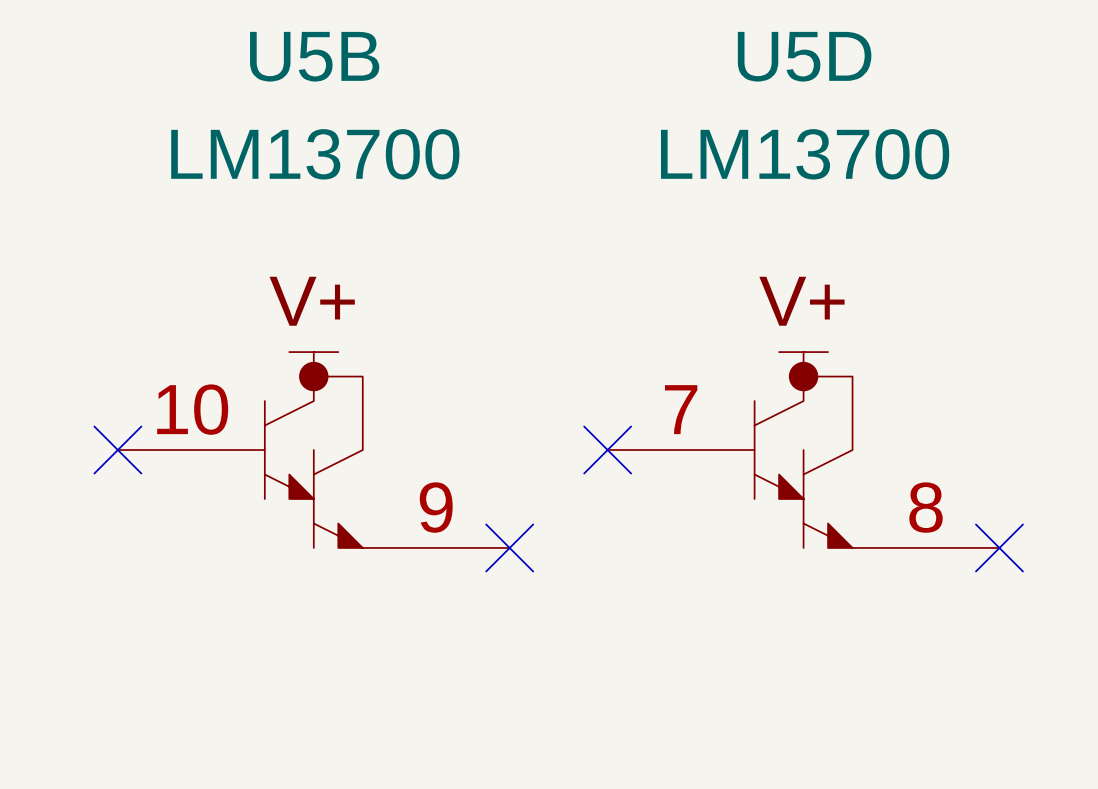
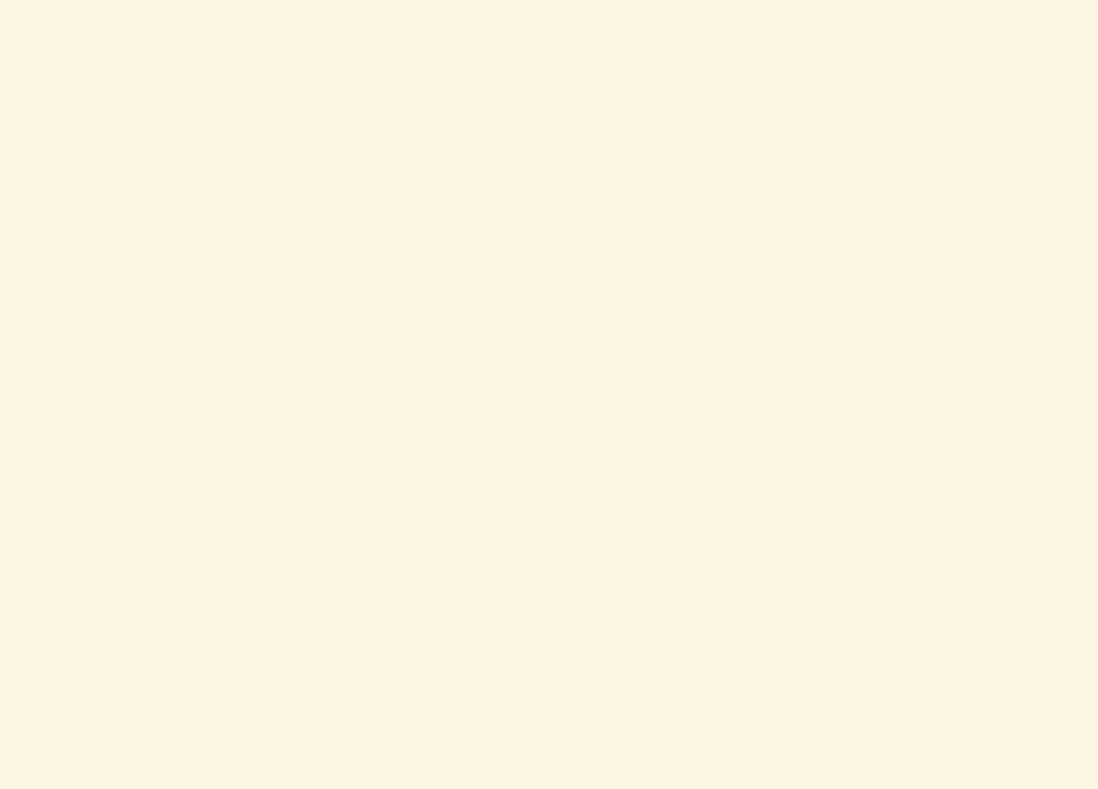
no-connect mark: (117, 450) -> none
U5B: LM13700 (313, 450) -> none
no-connect mark: (607, 450) -> none
U5D: LM13700 (803, 450) -> none
no-connect mark: (509, 547) -> none
no-connect mark: (999, 547) -> none

